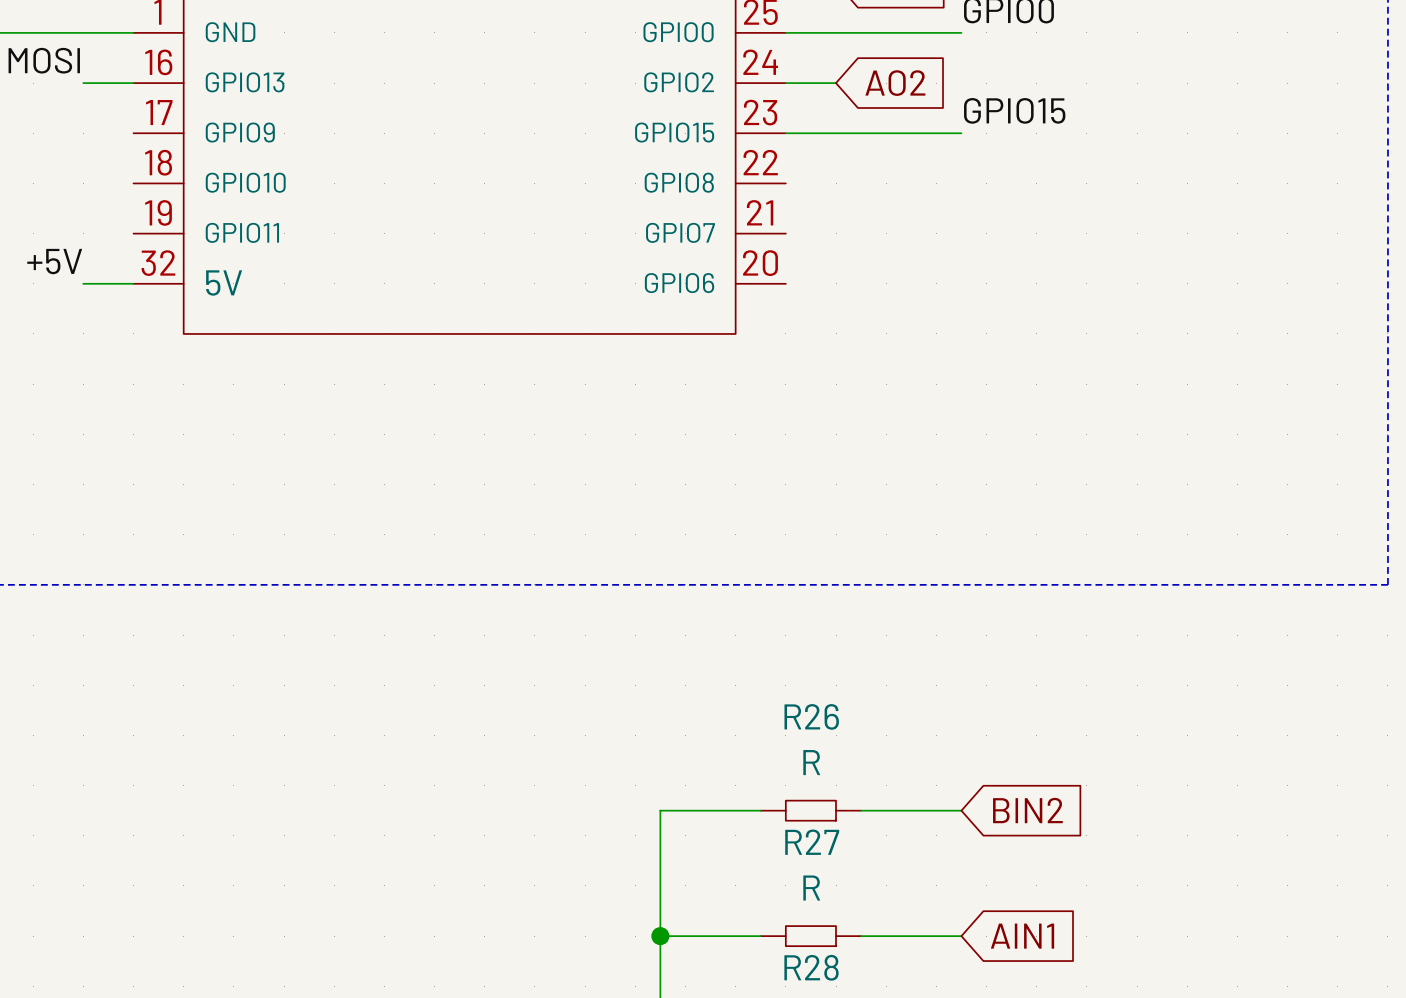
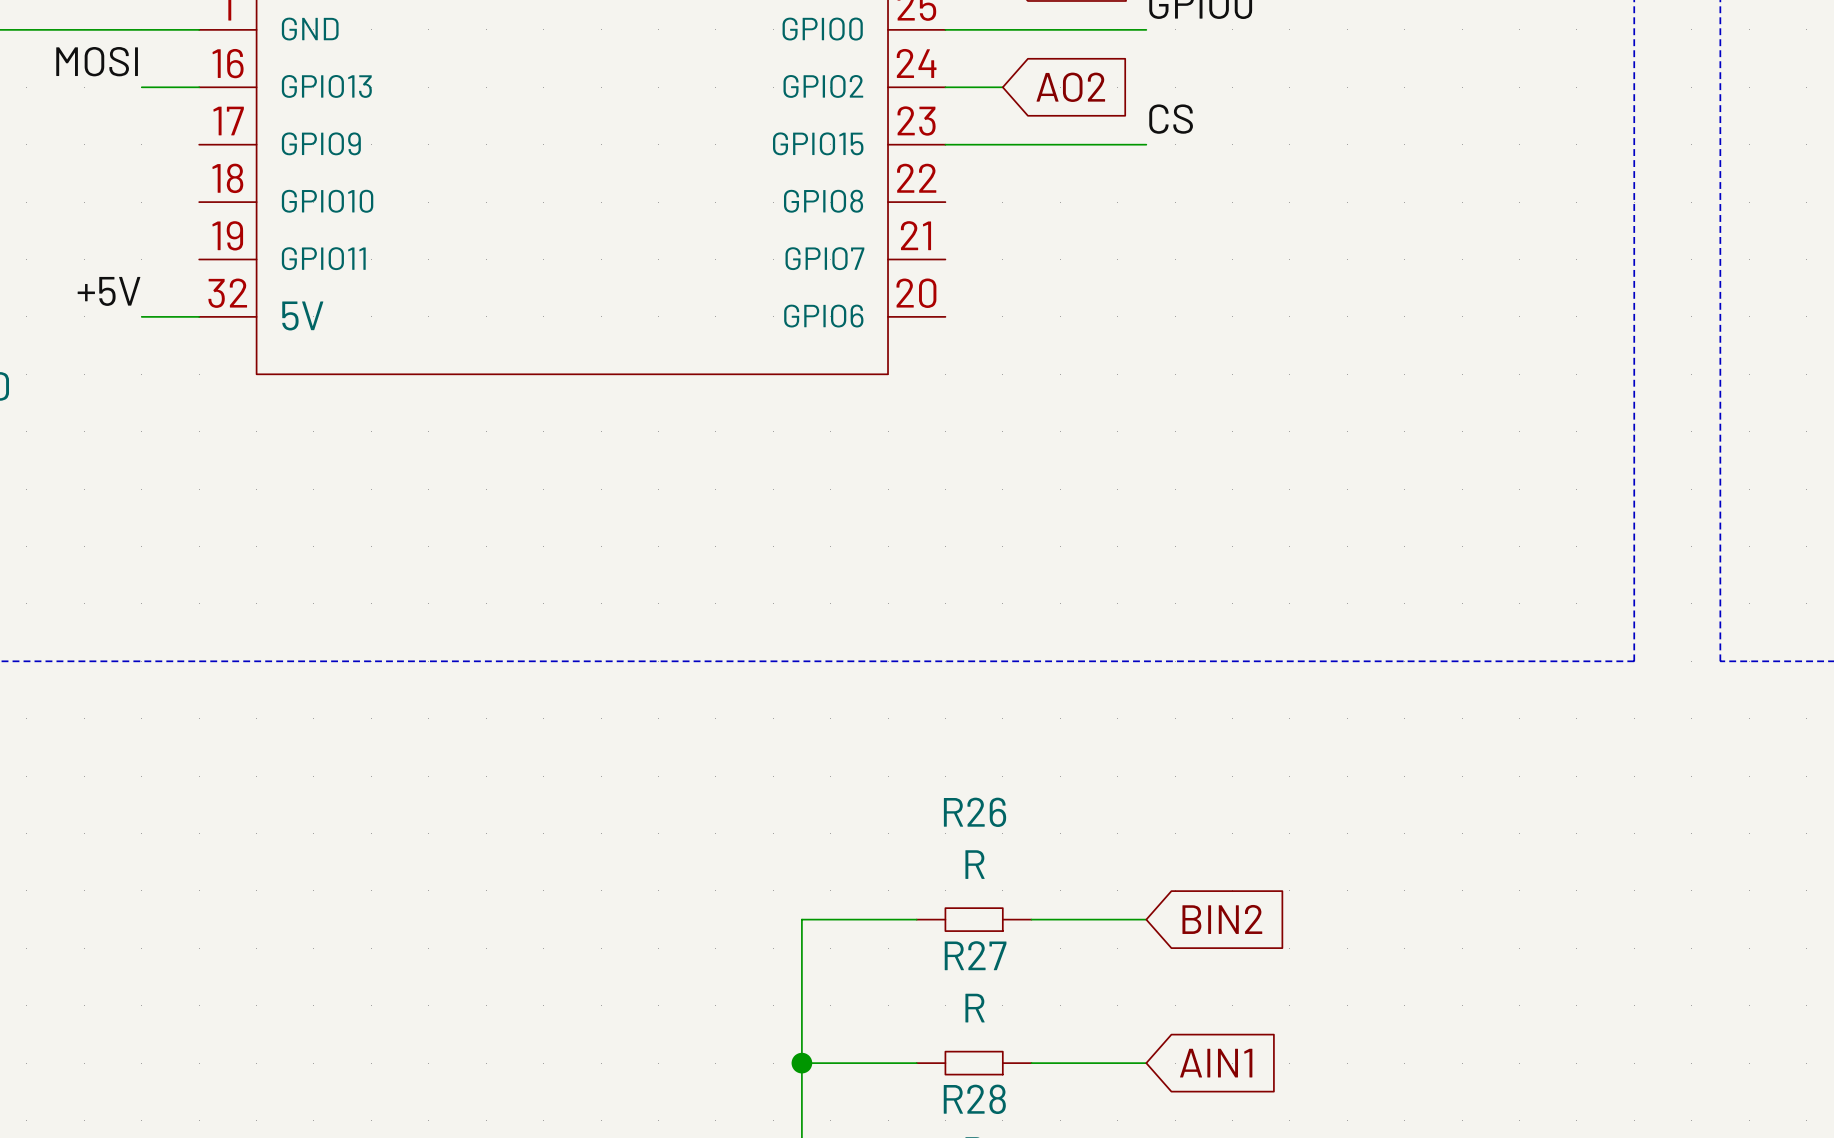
label: GPIO15 (1014, 110) -> CS (1171, 119)

